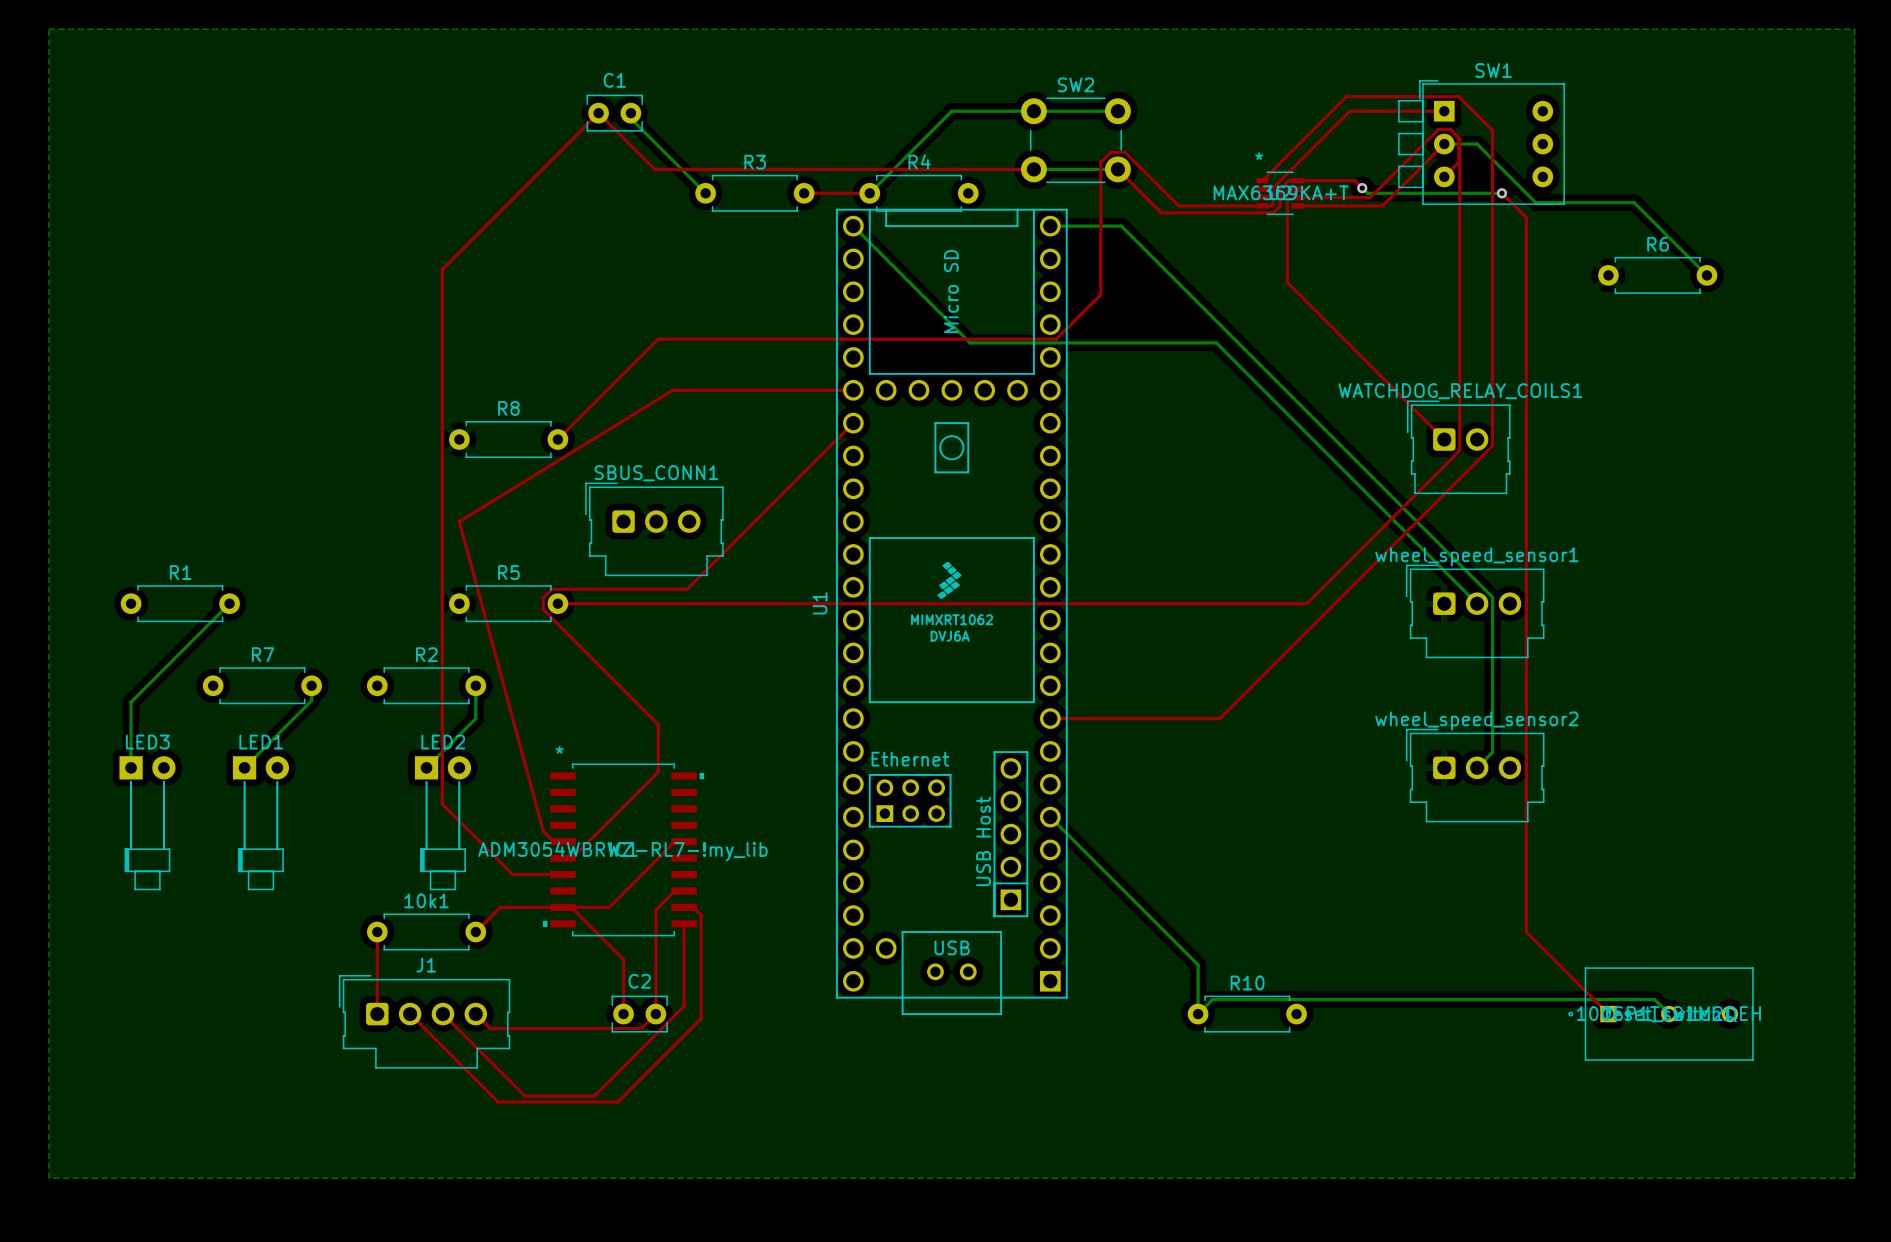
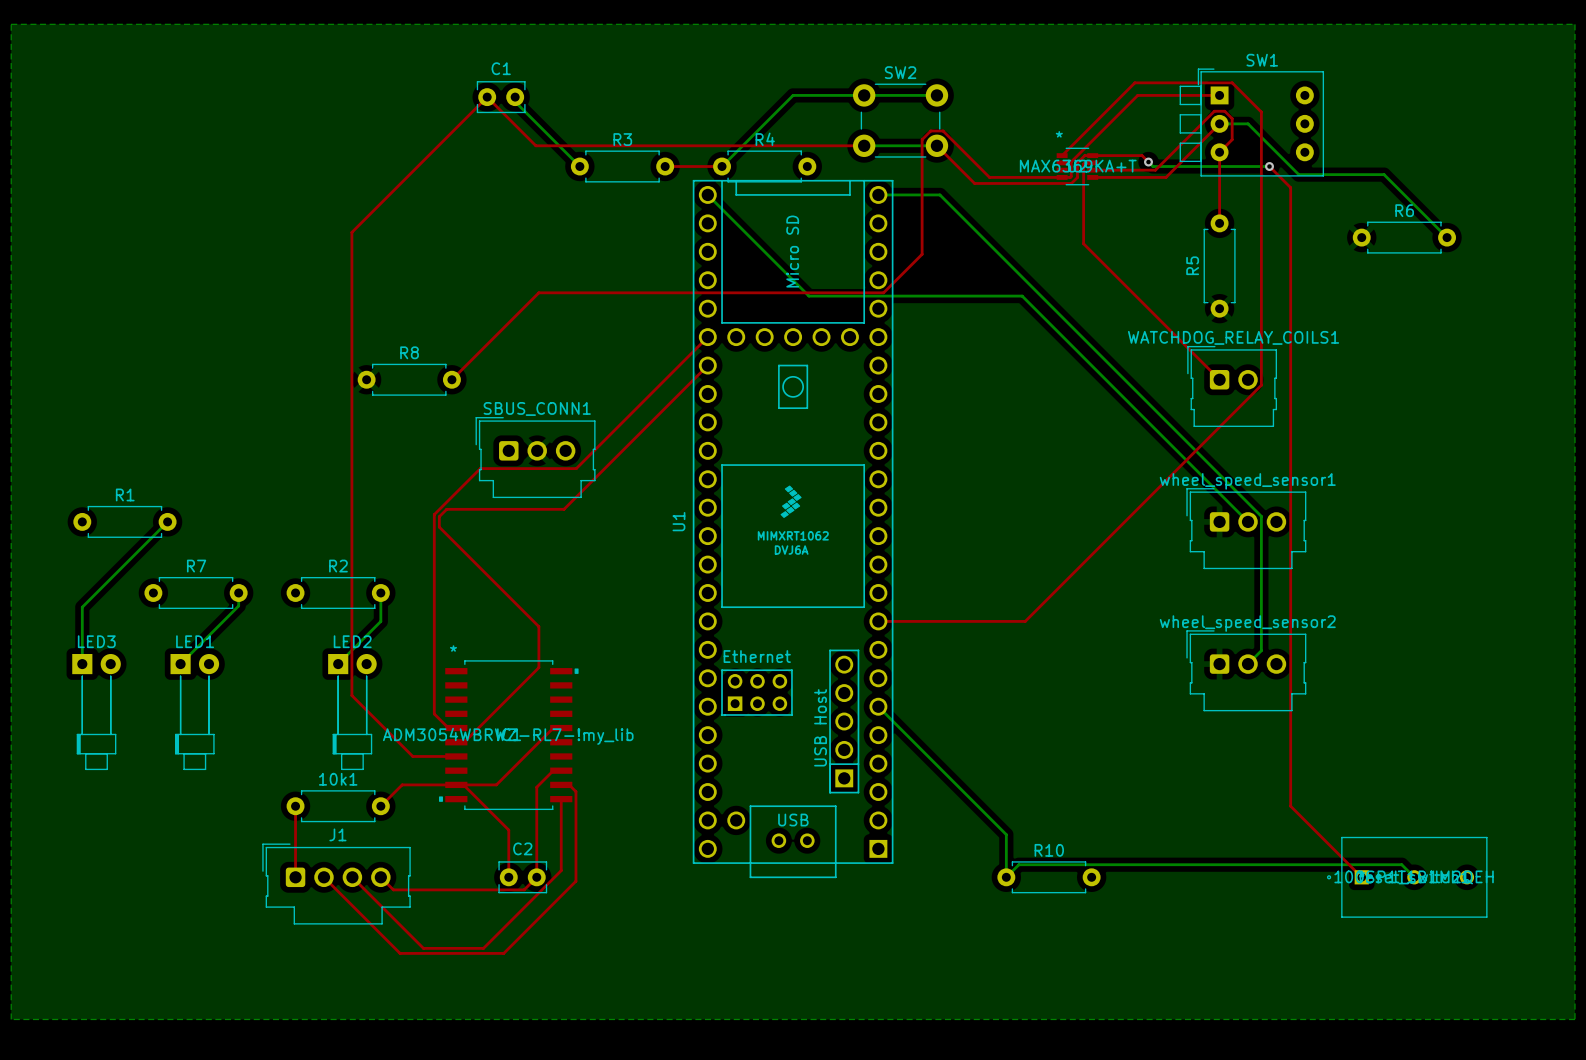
top track: (1458, 138) (1459, 450) (1306, 603) (557, 603) -> none
top track: none -> (1219, 152) (1219, 223)
top track: (853, 390) (672, 390) (459, 521) (543, 831) -> (707, 337) (576, 468) (480, 468) (434, 514) (434, 713) (439, 719)
R5 name position: R5 (508, 572) -> R5 (1192, 265)
R5 rotation: 0° (508, 603) -> 90° clockwise (1219, 266)
R5 position: (508, 603) -> (1219, 266)

